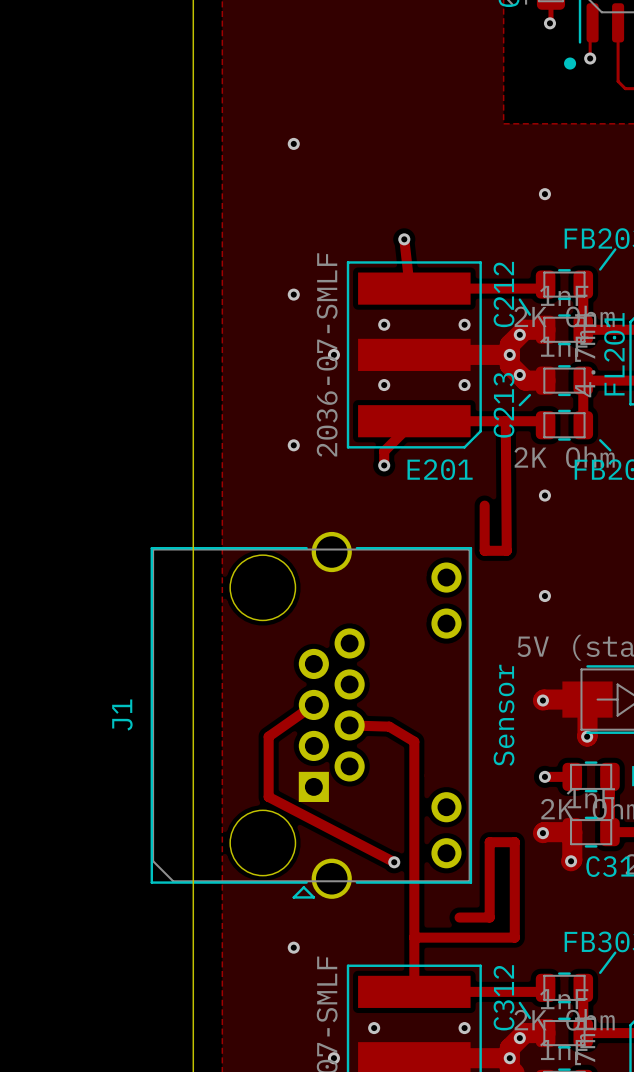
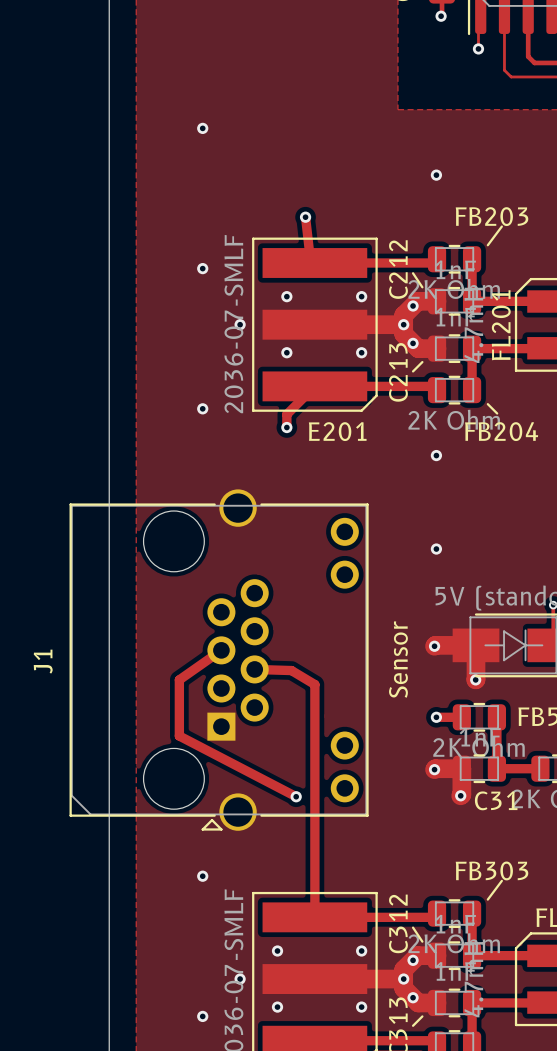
drawing: [564, 57, 577, 70] -> none
track: (505, 421) (506, 550) (484, 550) (484, 505) -> none
track: (459, 917) (489, 917) (489, 842) (514, 842) (514, 937) (414, 937) -> none

